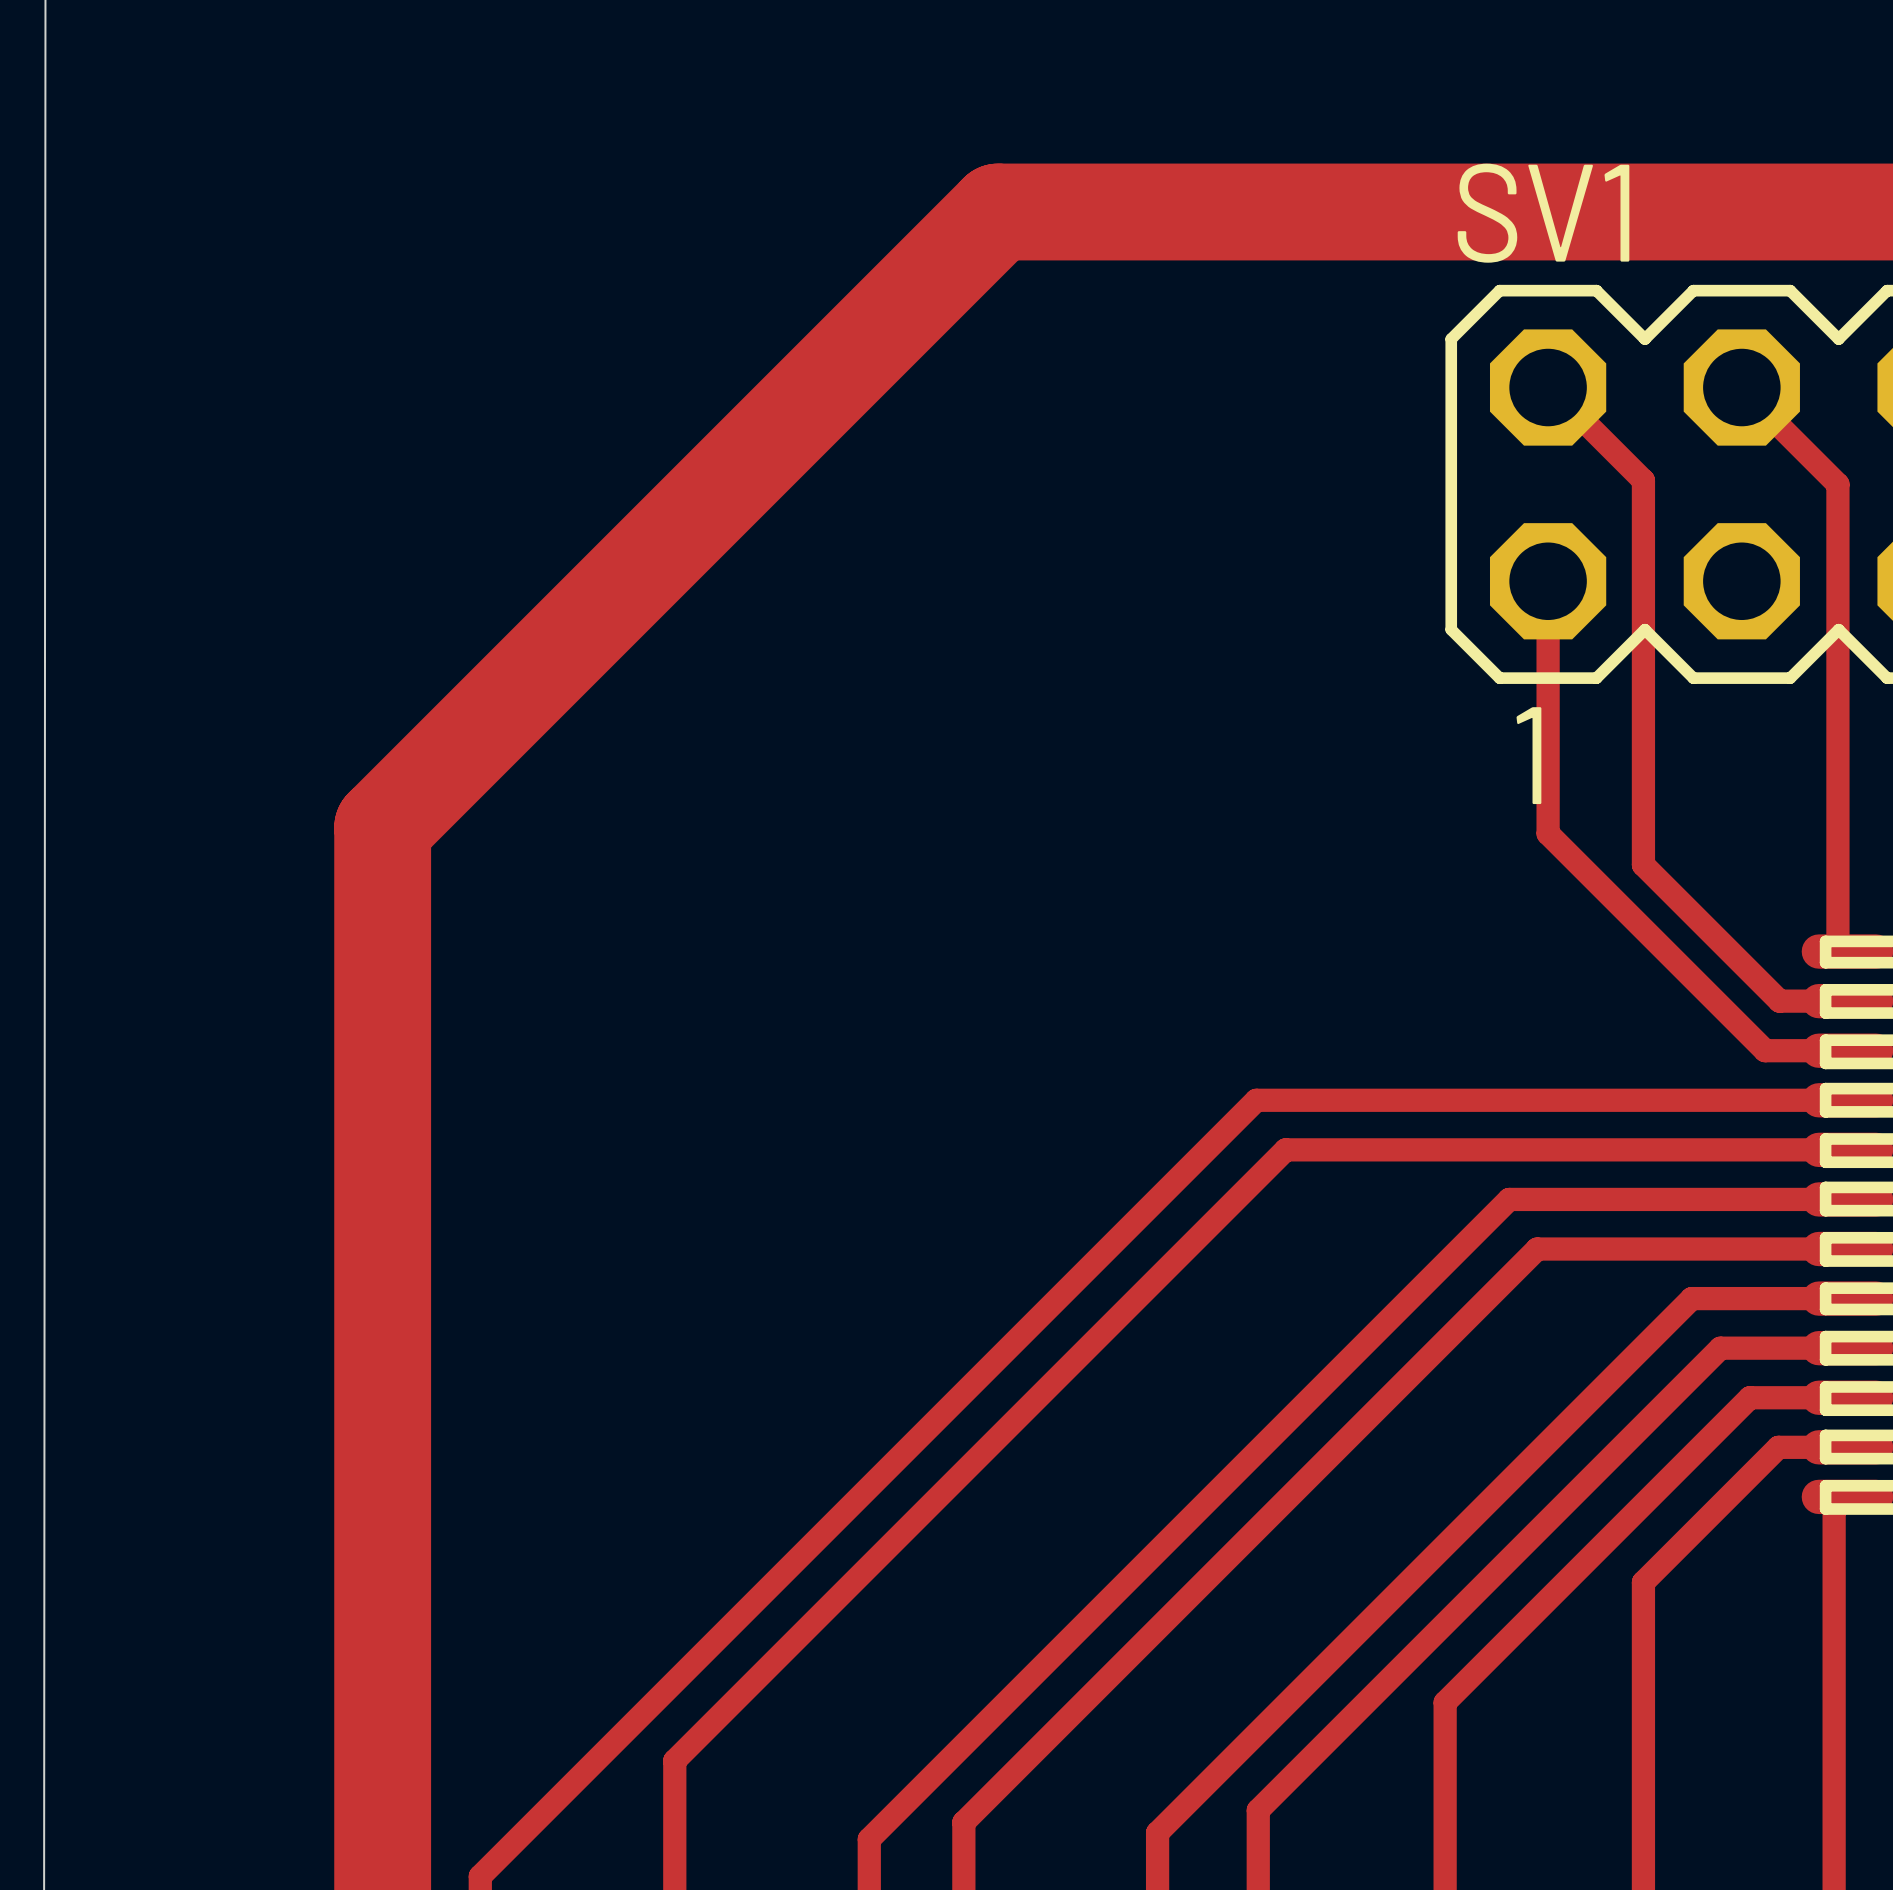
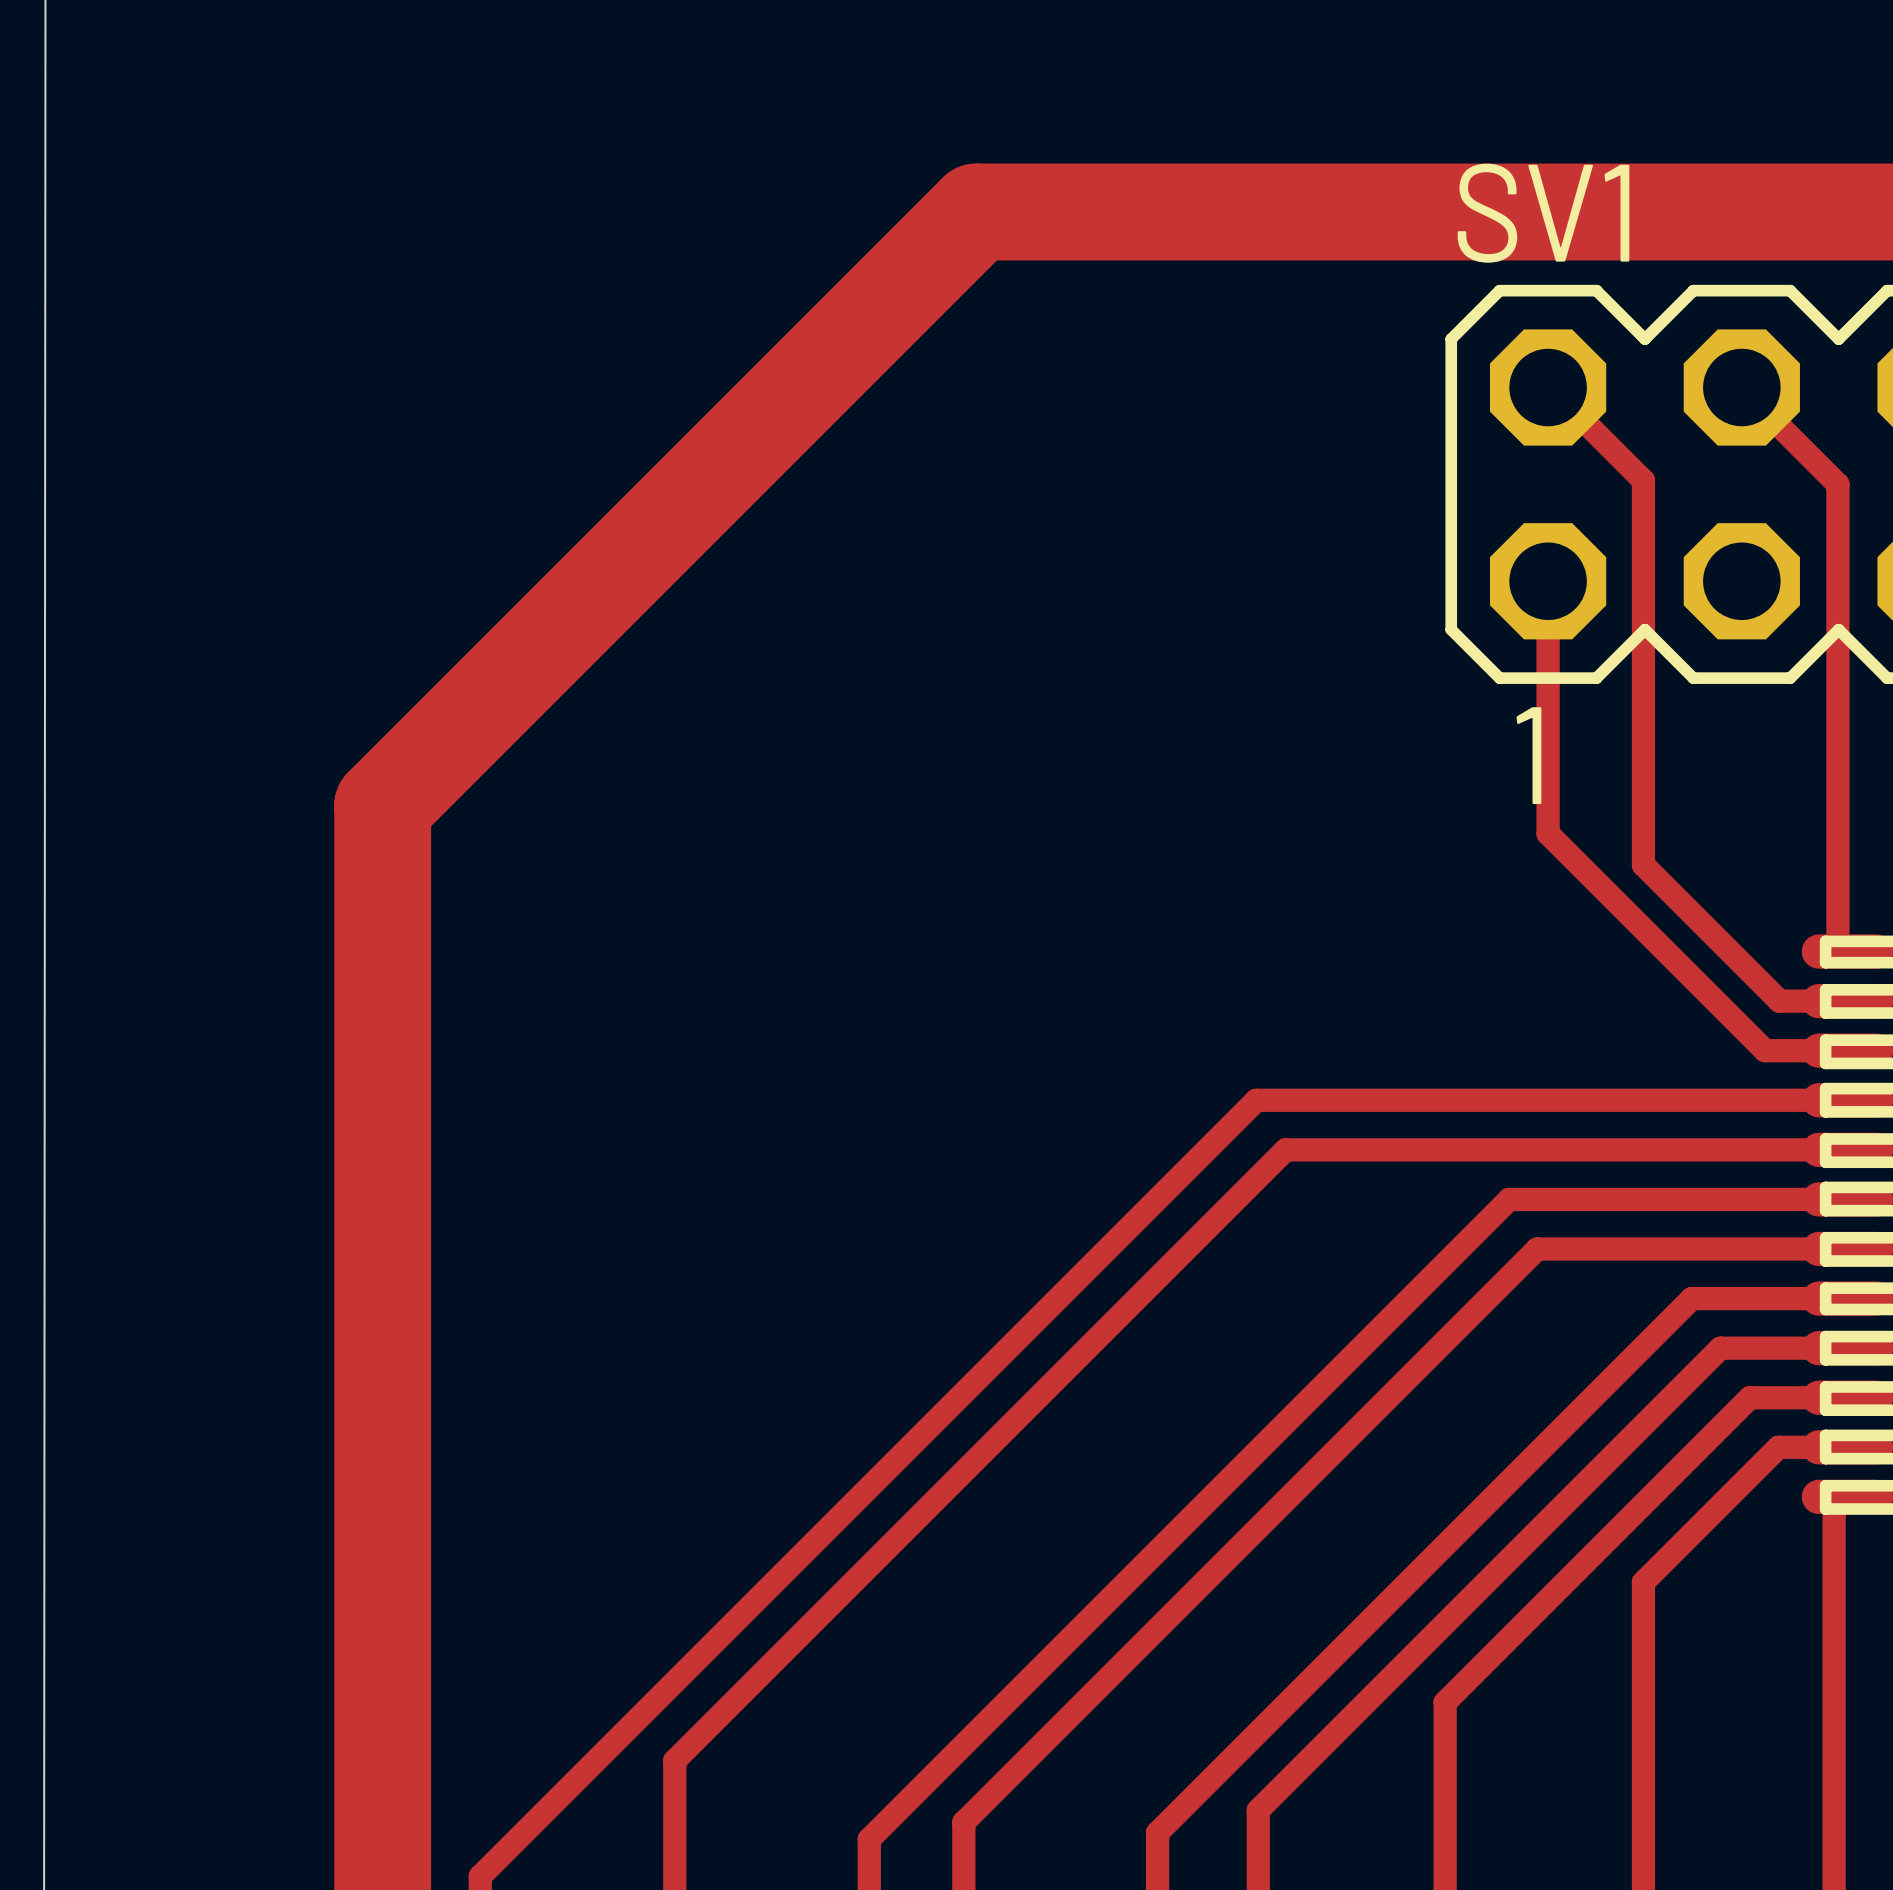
track: (998, 211) (382, 827) -> (998, 211) (976, 211) (382, 806) (382, 827)

